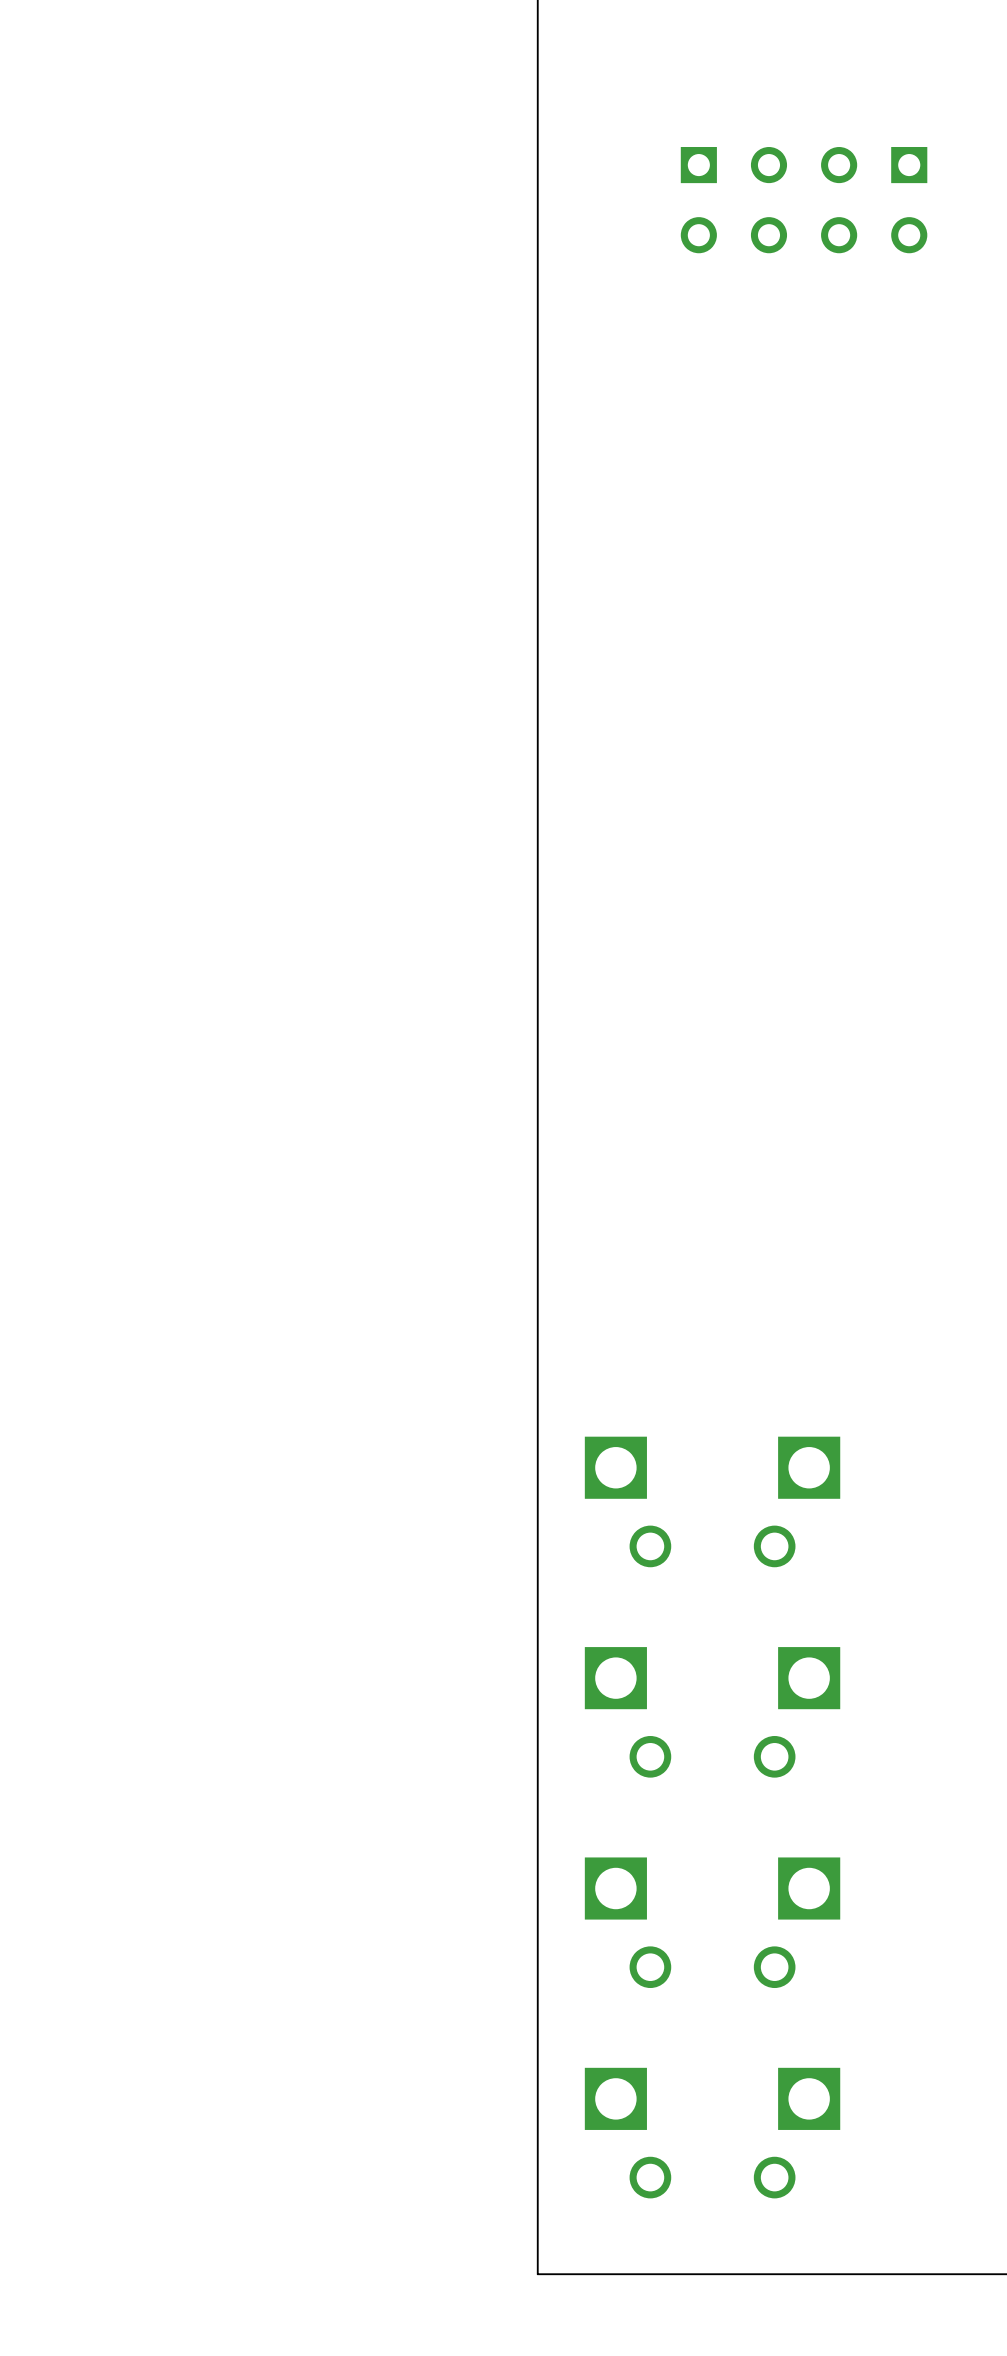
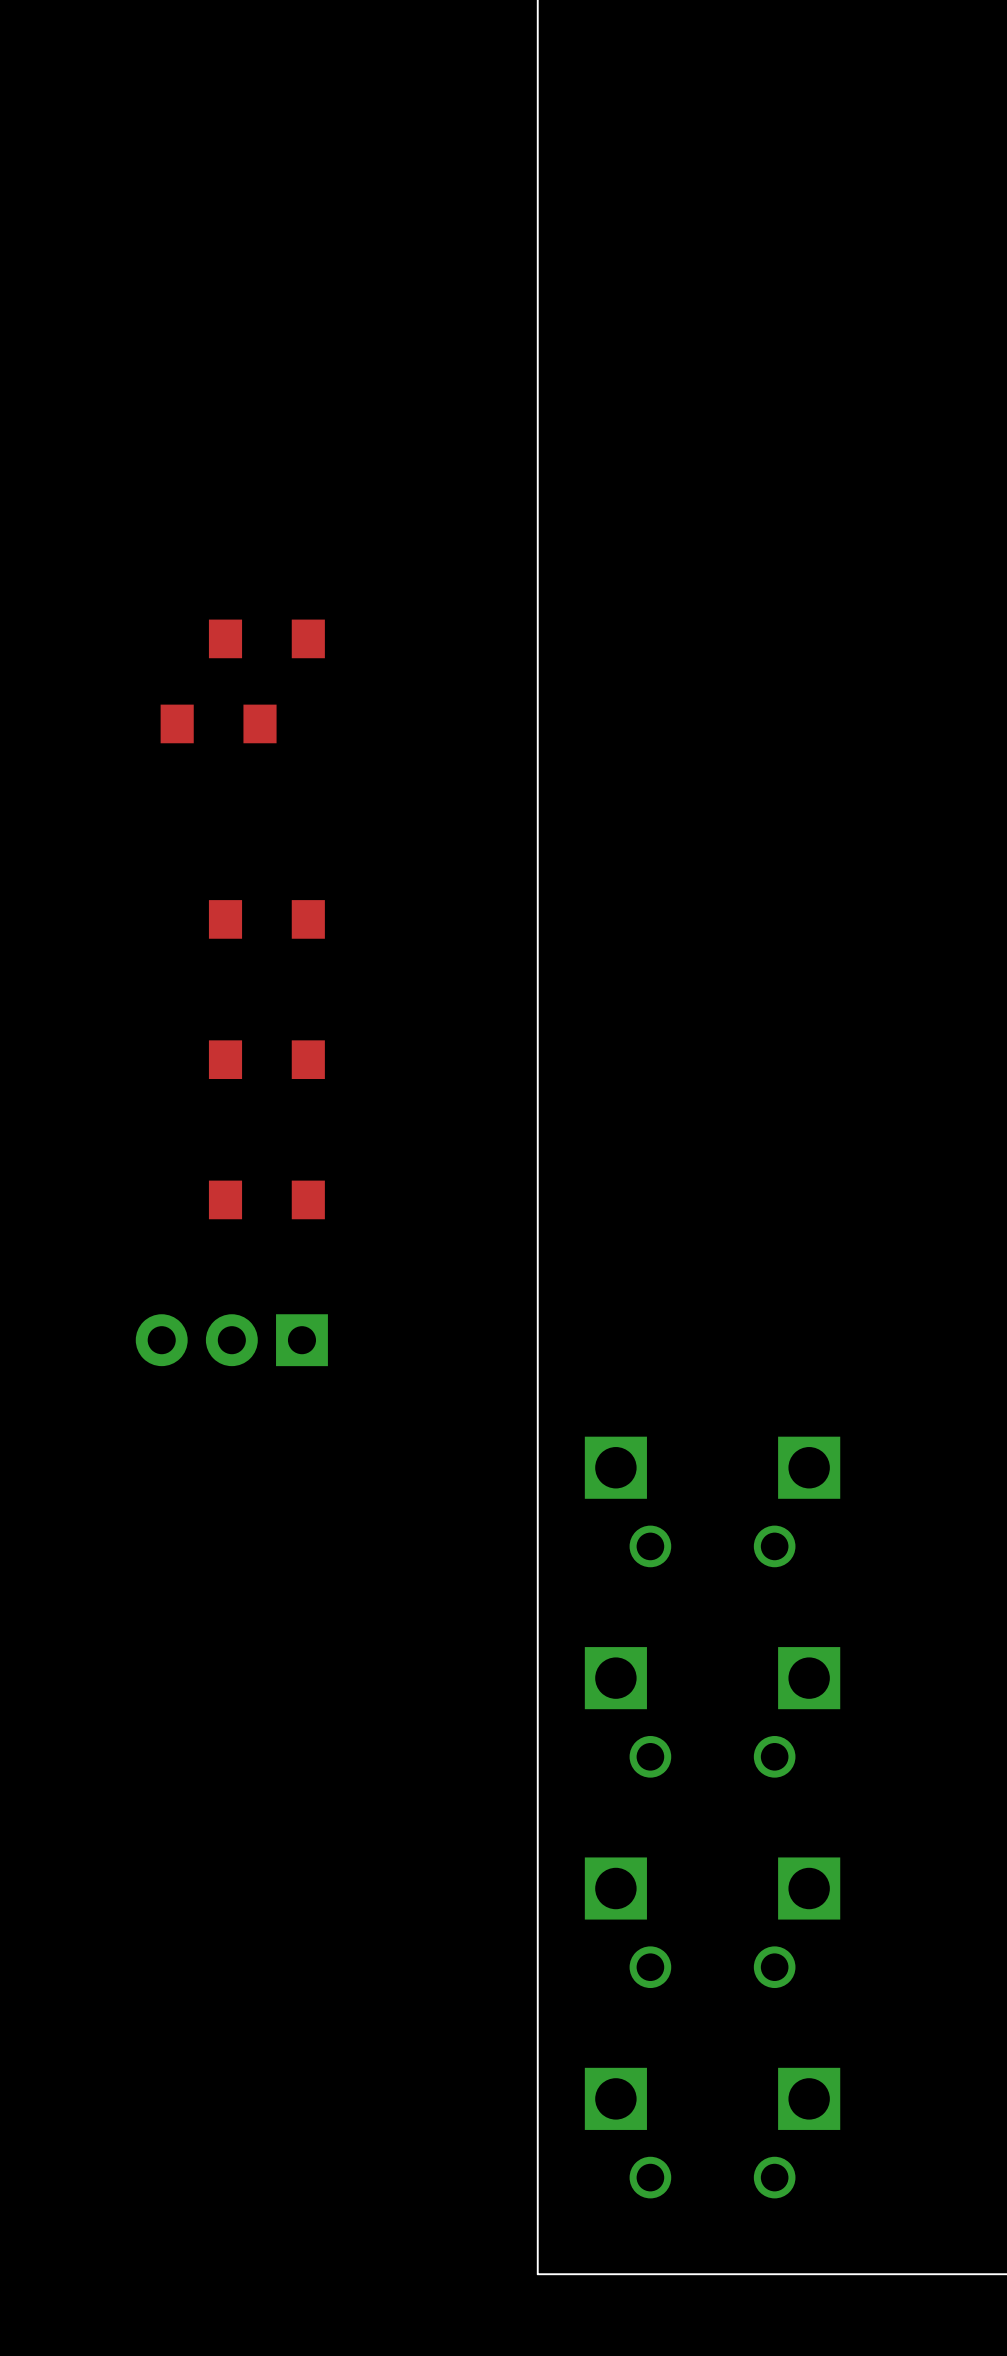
part: (804, 200) -> none
part: none -> (266, 638)
part: none -> (218, 723)
part: none -> (266, 919)
part: none -> (266, 1059)
part: none -> (266, 1199)
part: none -> (231, 1340)

